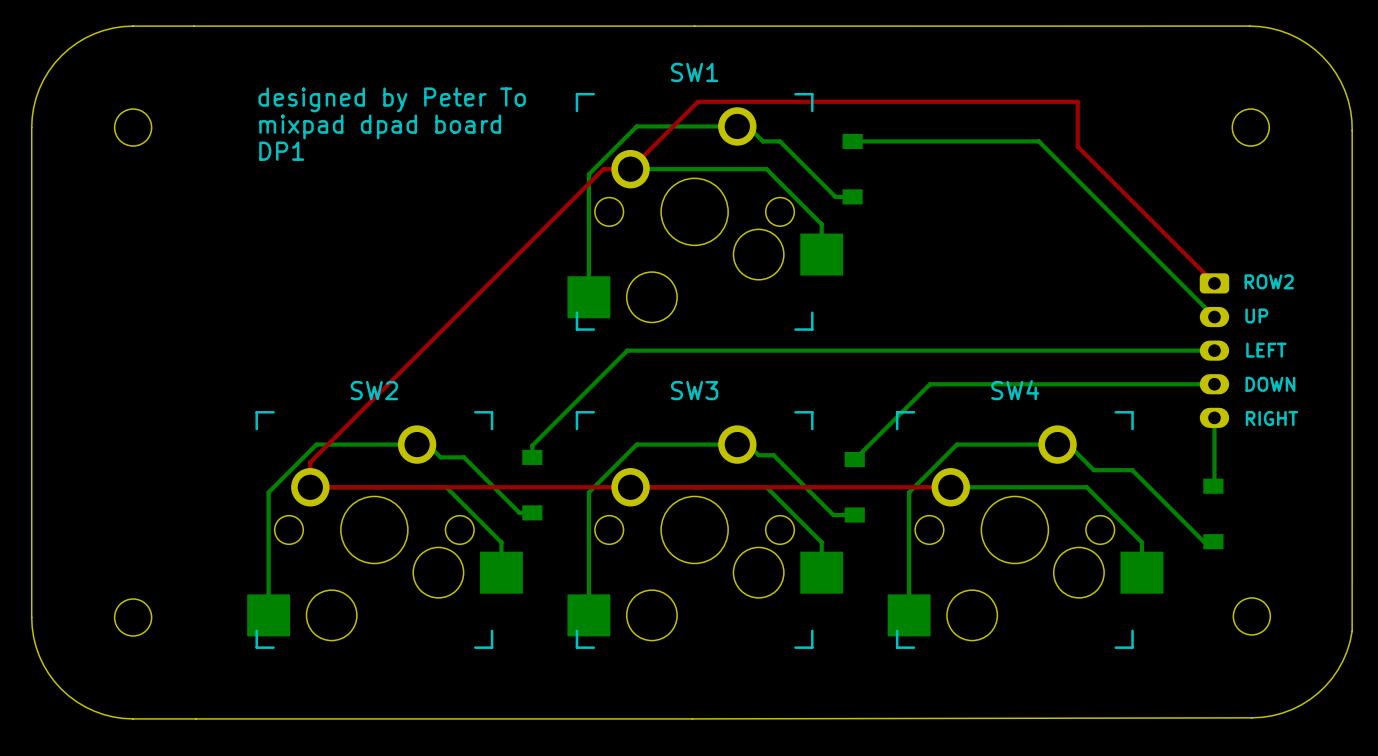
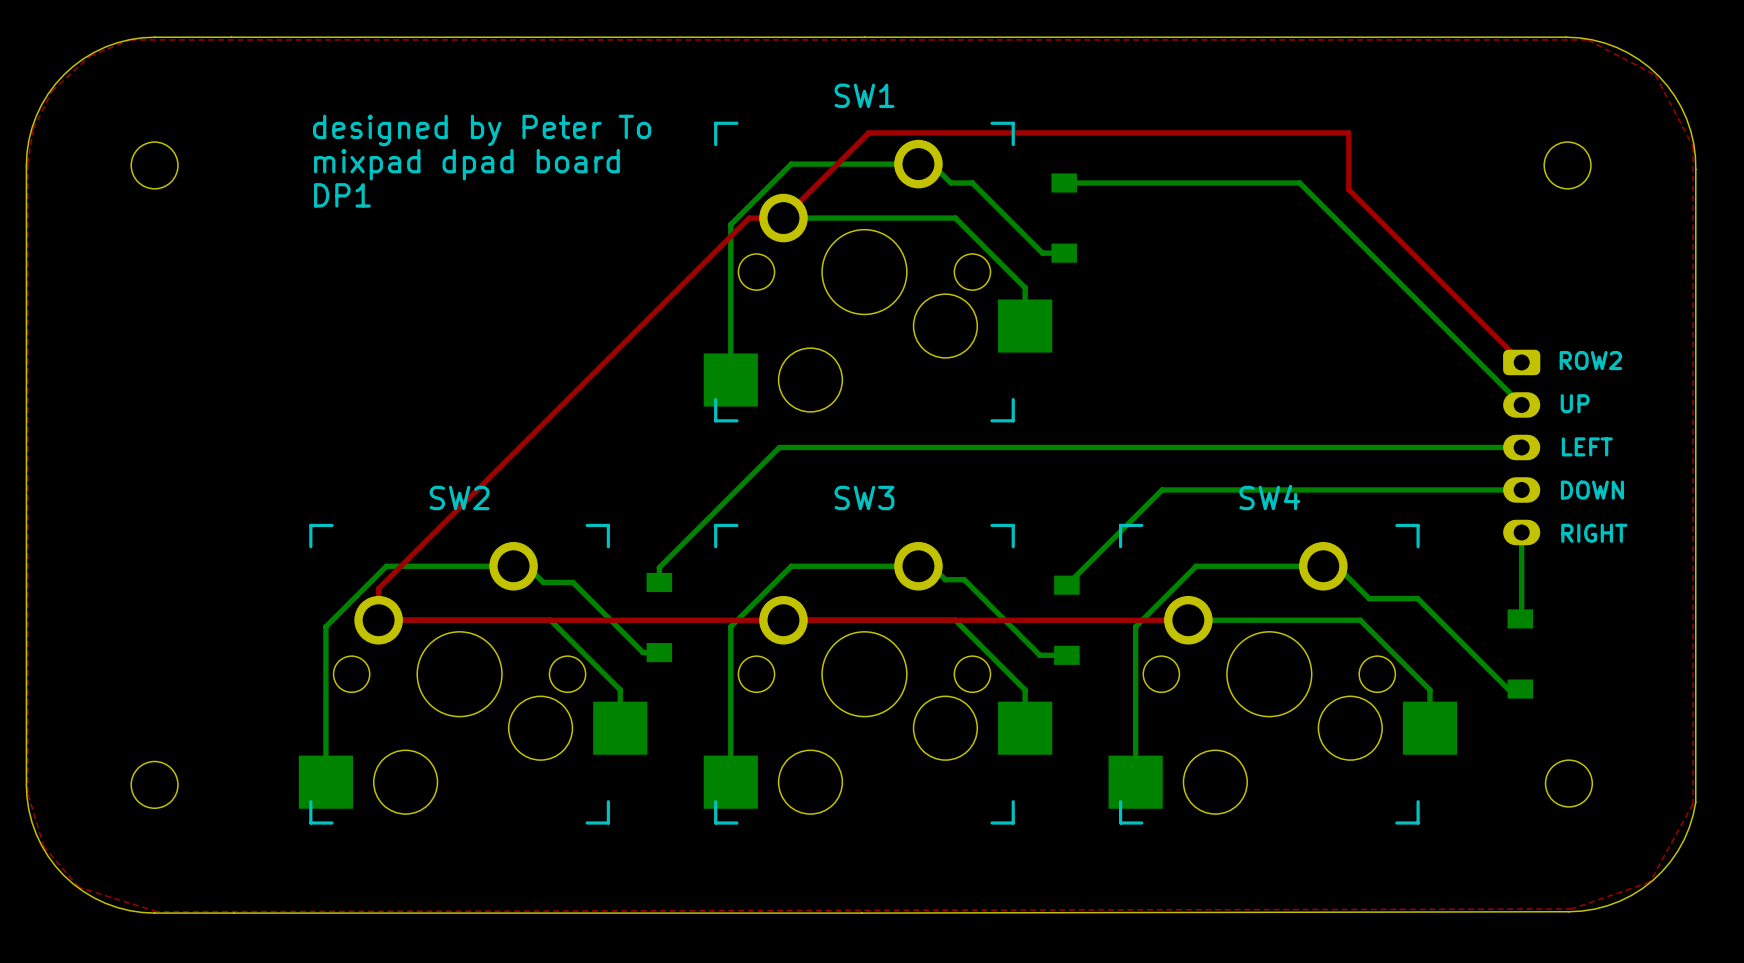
top zone outline: none -> (130, 39) (89, 56) (52, 91) (33, 129) (27, 164) (27, 792) (43, 846) (79, 887) (157, 911) (1571, 909) (1649, 882) (1693, 803) (1693, 146) (1655, 75) (1587, 39) (130, 39)

